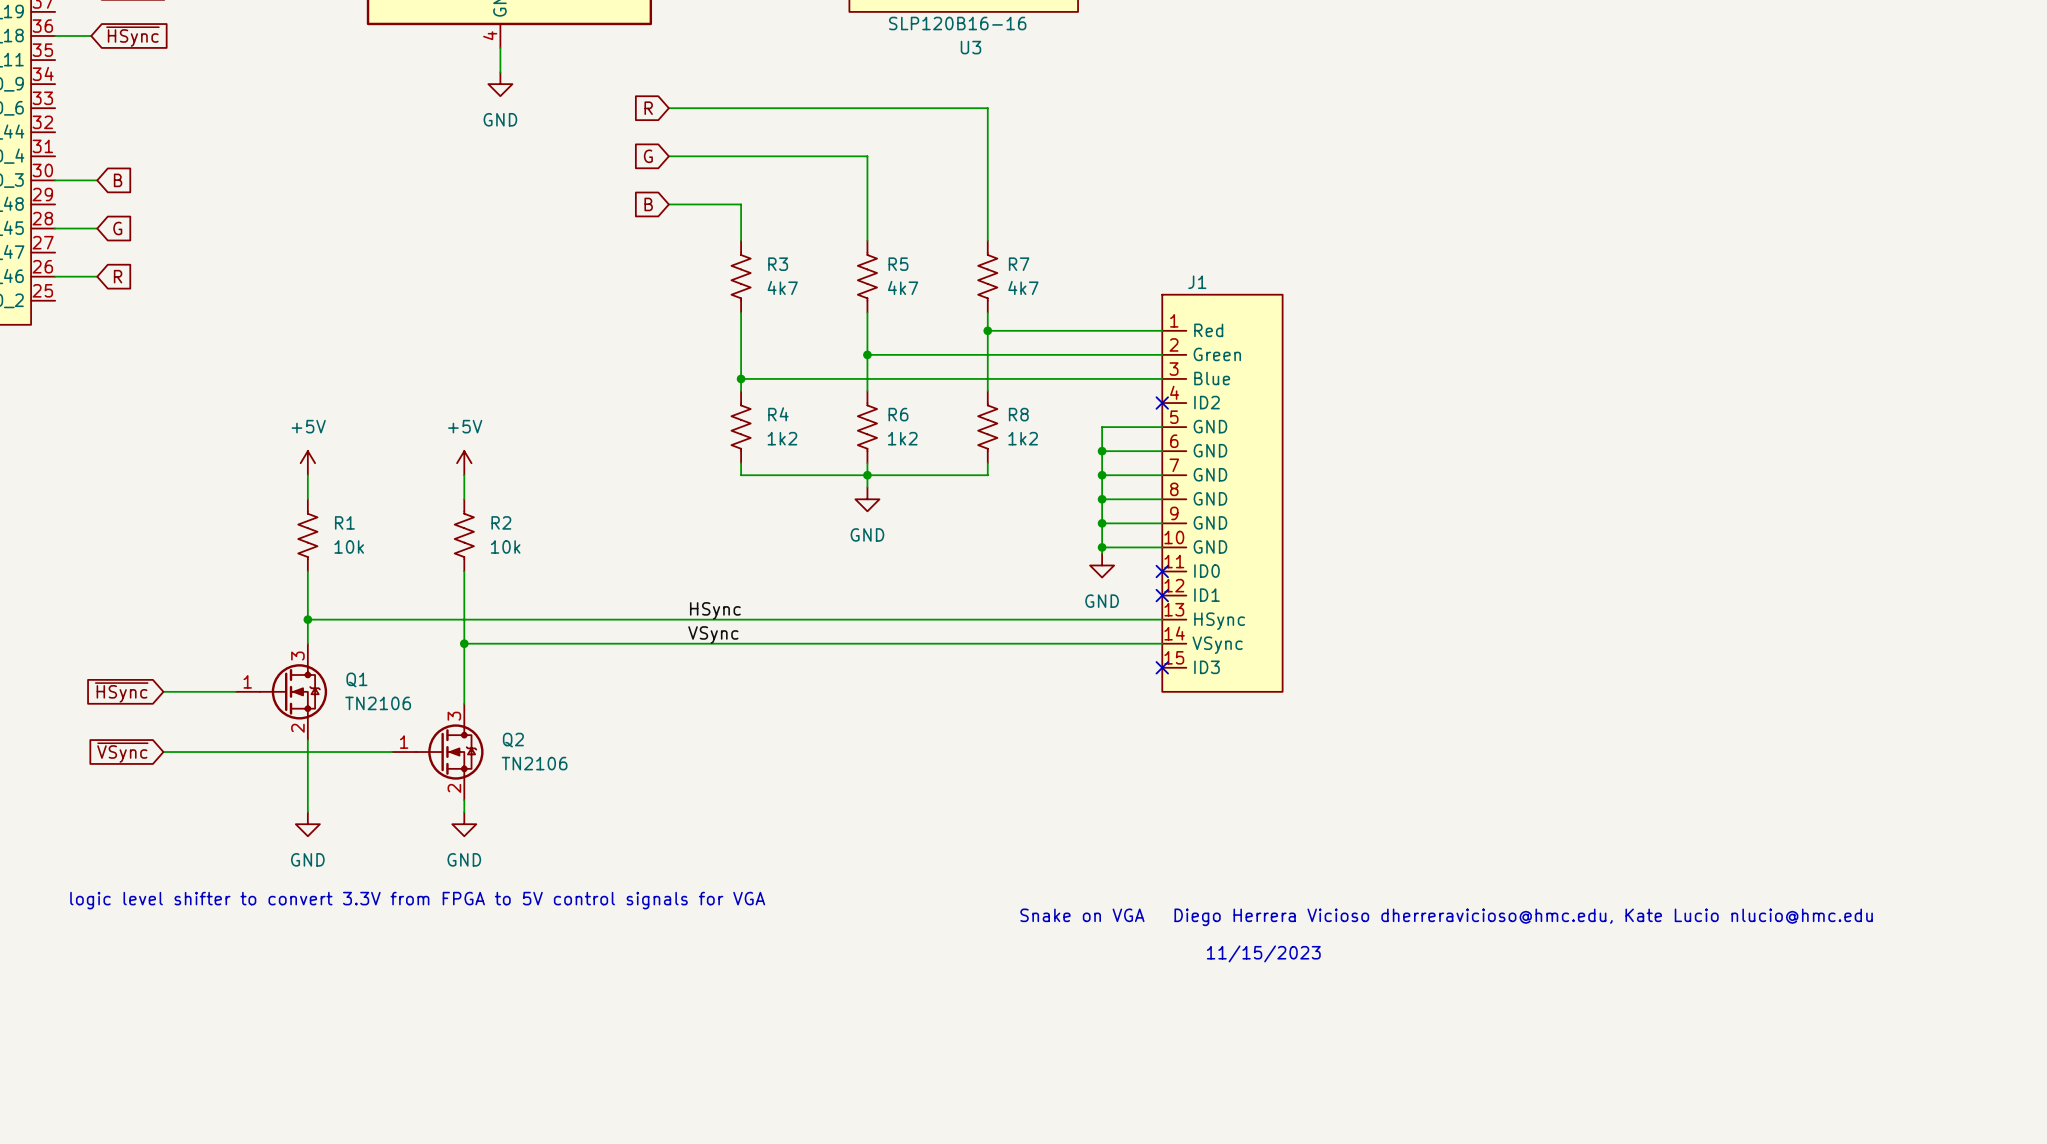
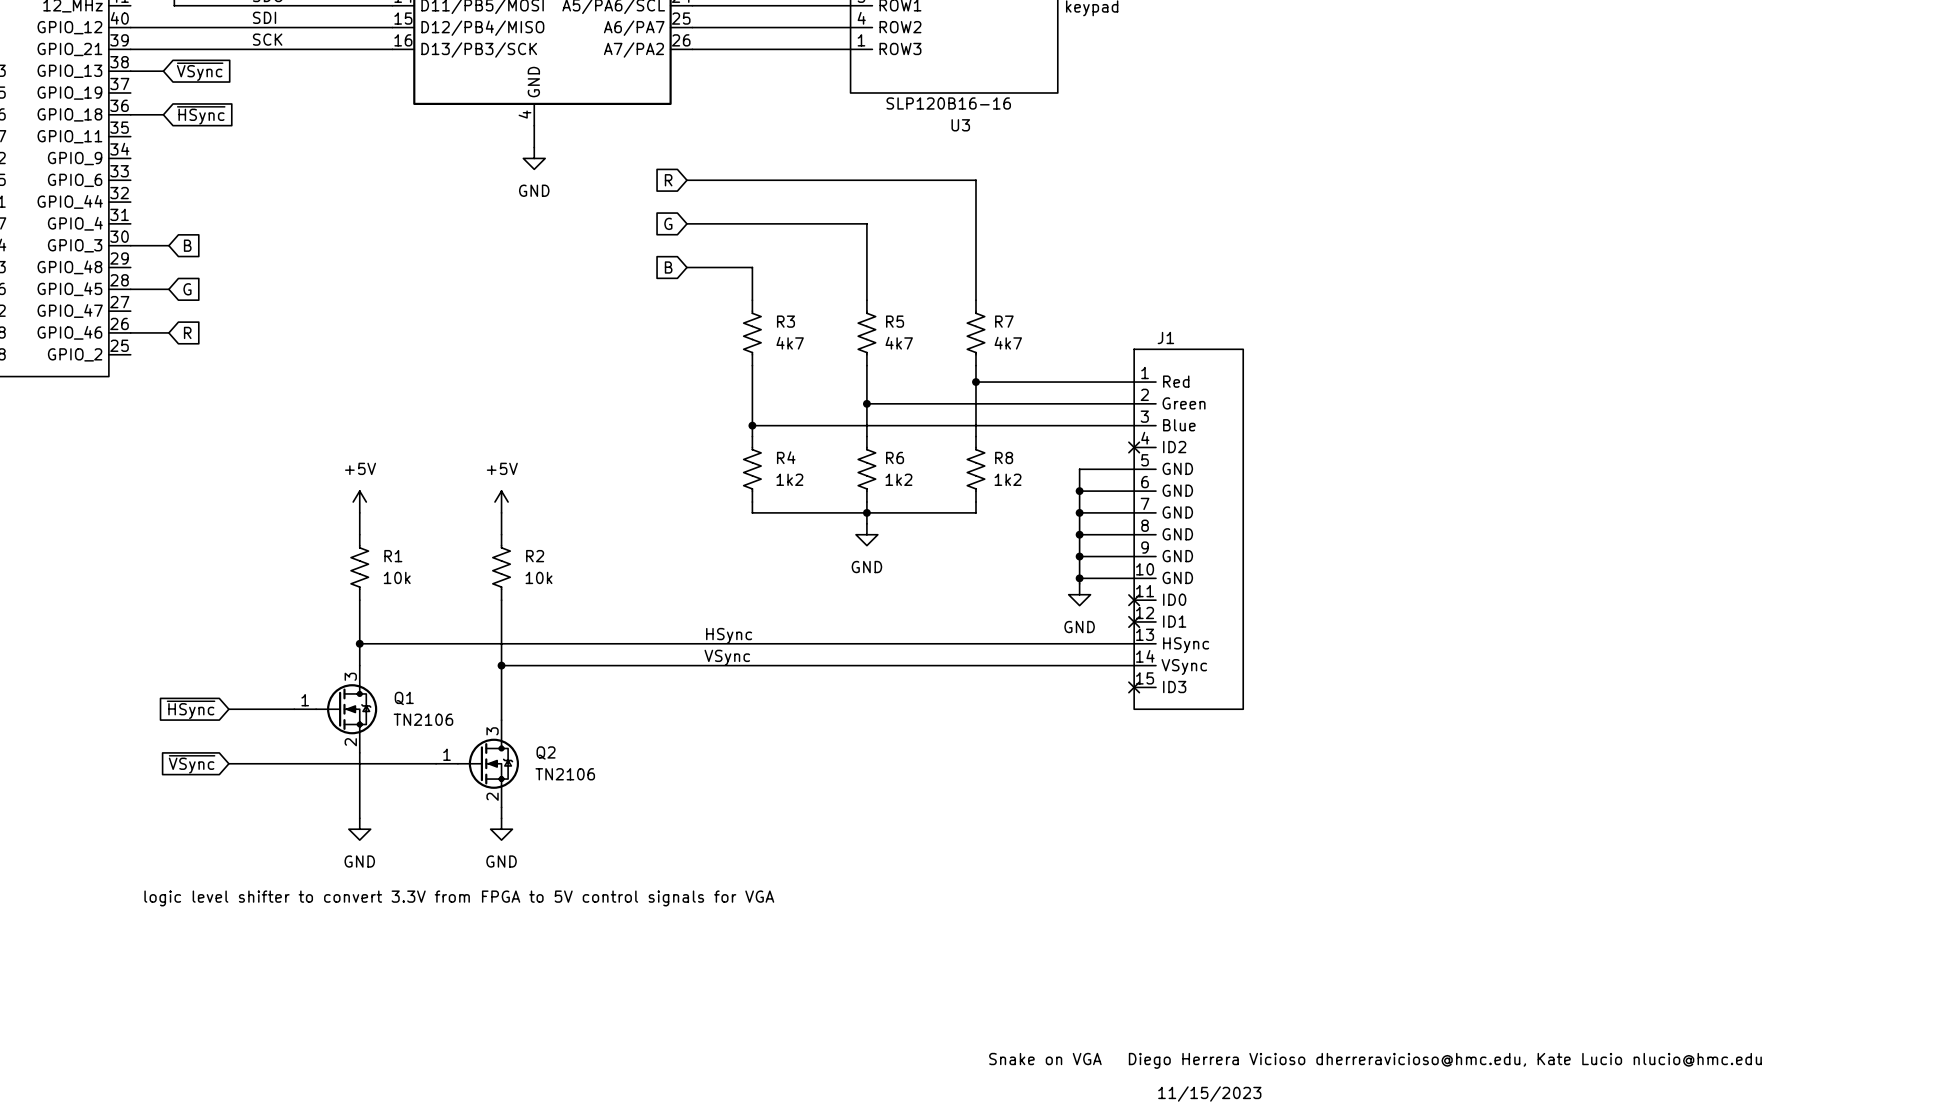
text position: Snake on VGA Diego Herrera Vicioso dherreravicioso@hmc.edu, Kate Lucio nlucio@hmc.edu (1446, 917) -> Snake on VGA Diego Herrera Vicioso dherreravicioso@hmc.edu, Kate Lucio nlucio@hmc.edu (1375, 1060)
text position: 11/15/2023 (1263, 953) -> 11/15/2023 (1209, 1093)

